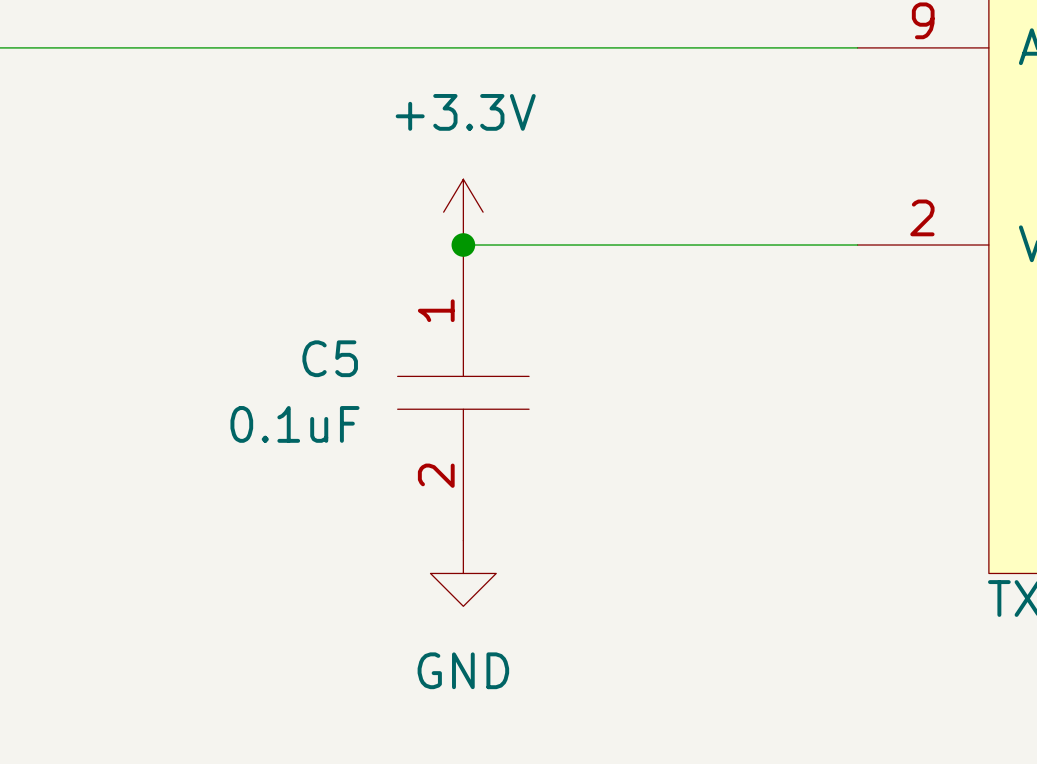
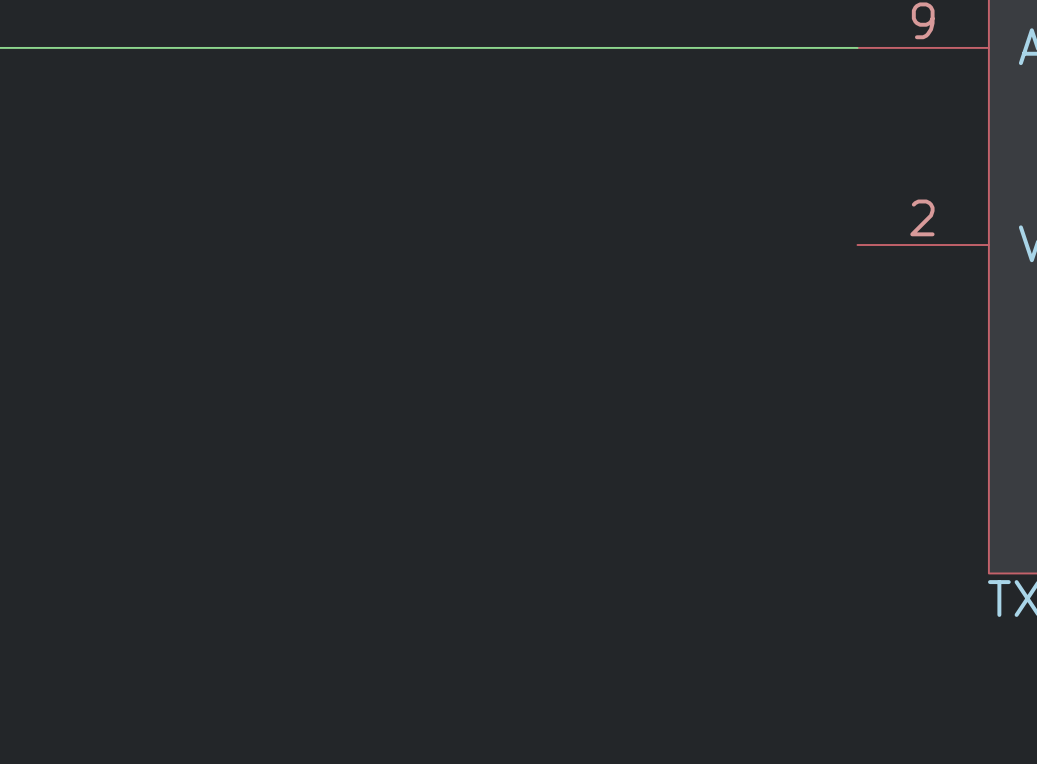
power symbol: +3.3V (463, 212) -> none
wire: (463, 245) (857, 245) -> none
junction: (463, 245) -> none
C5: (463, 392) -> none
power symbol: GND (463, 573) -> none

